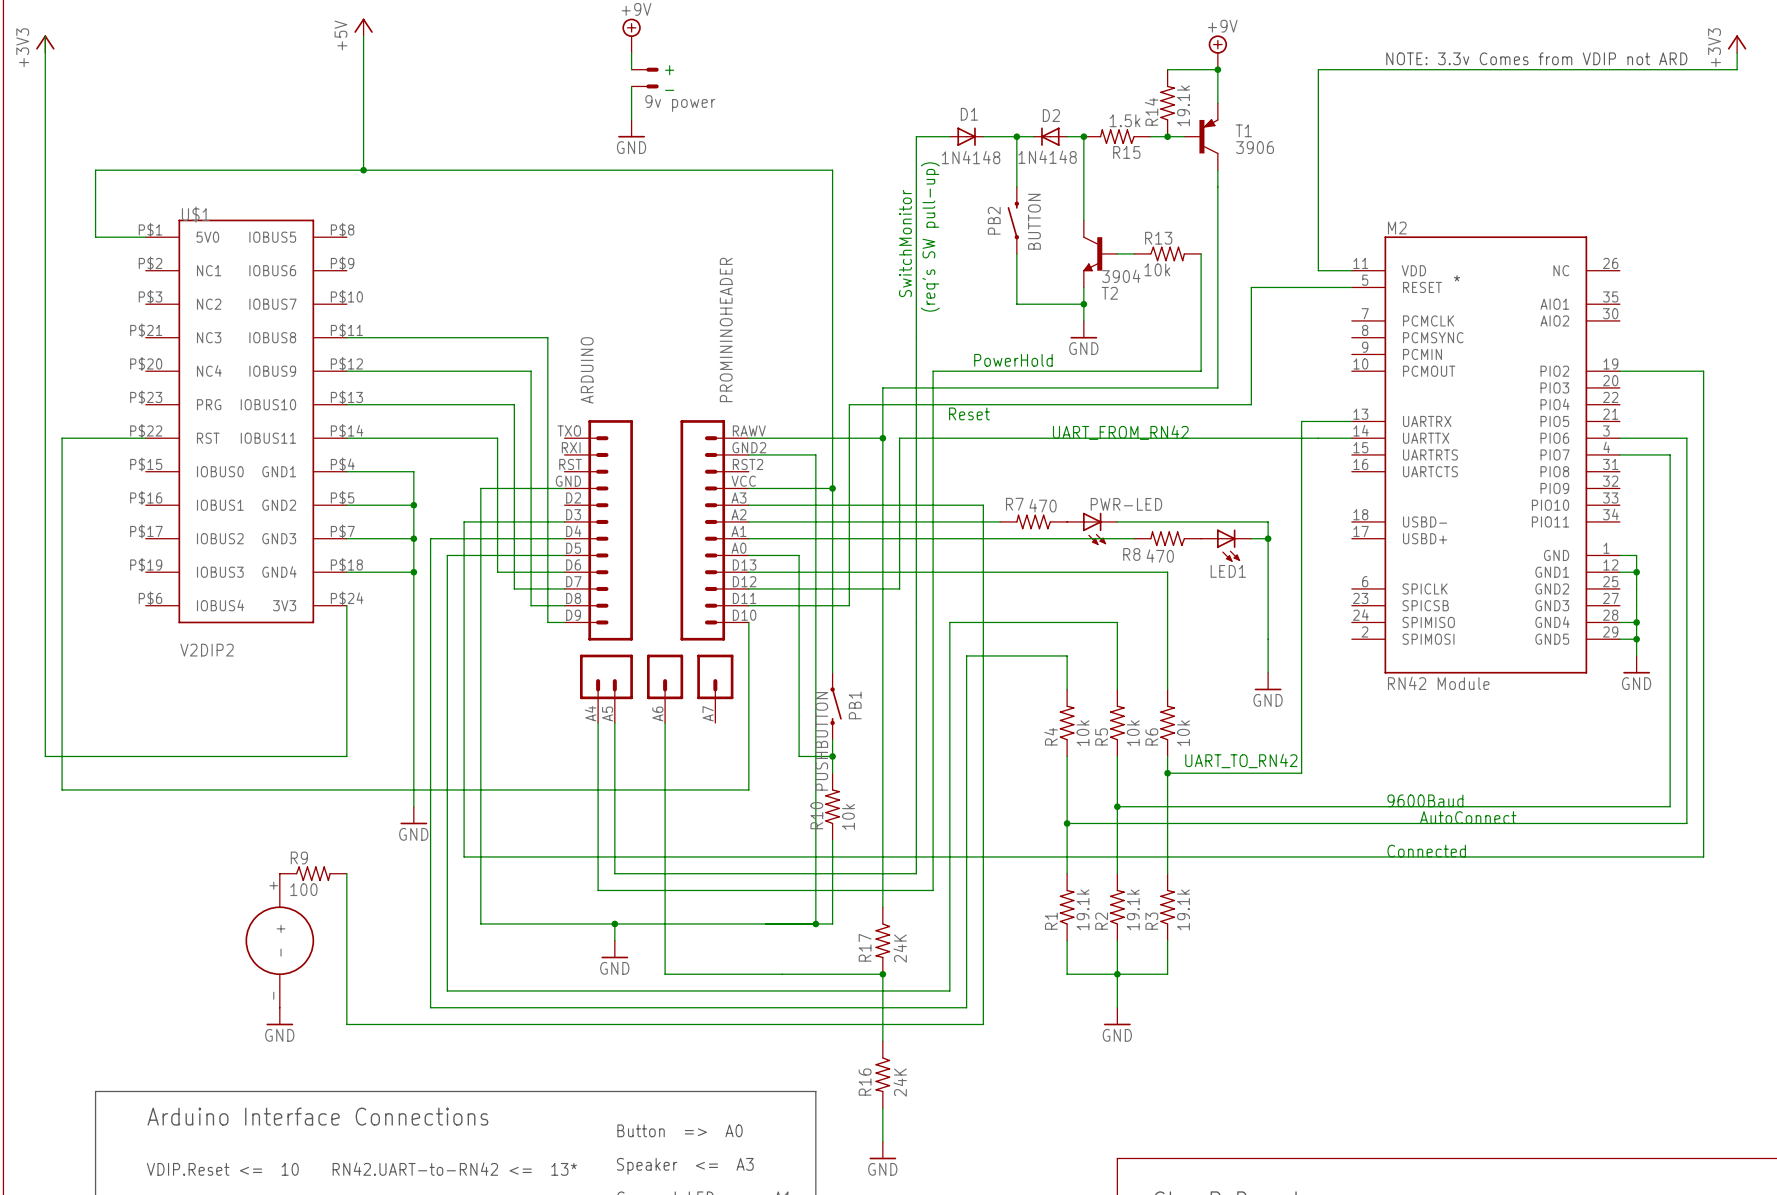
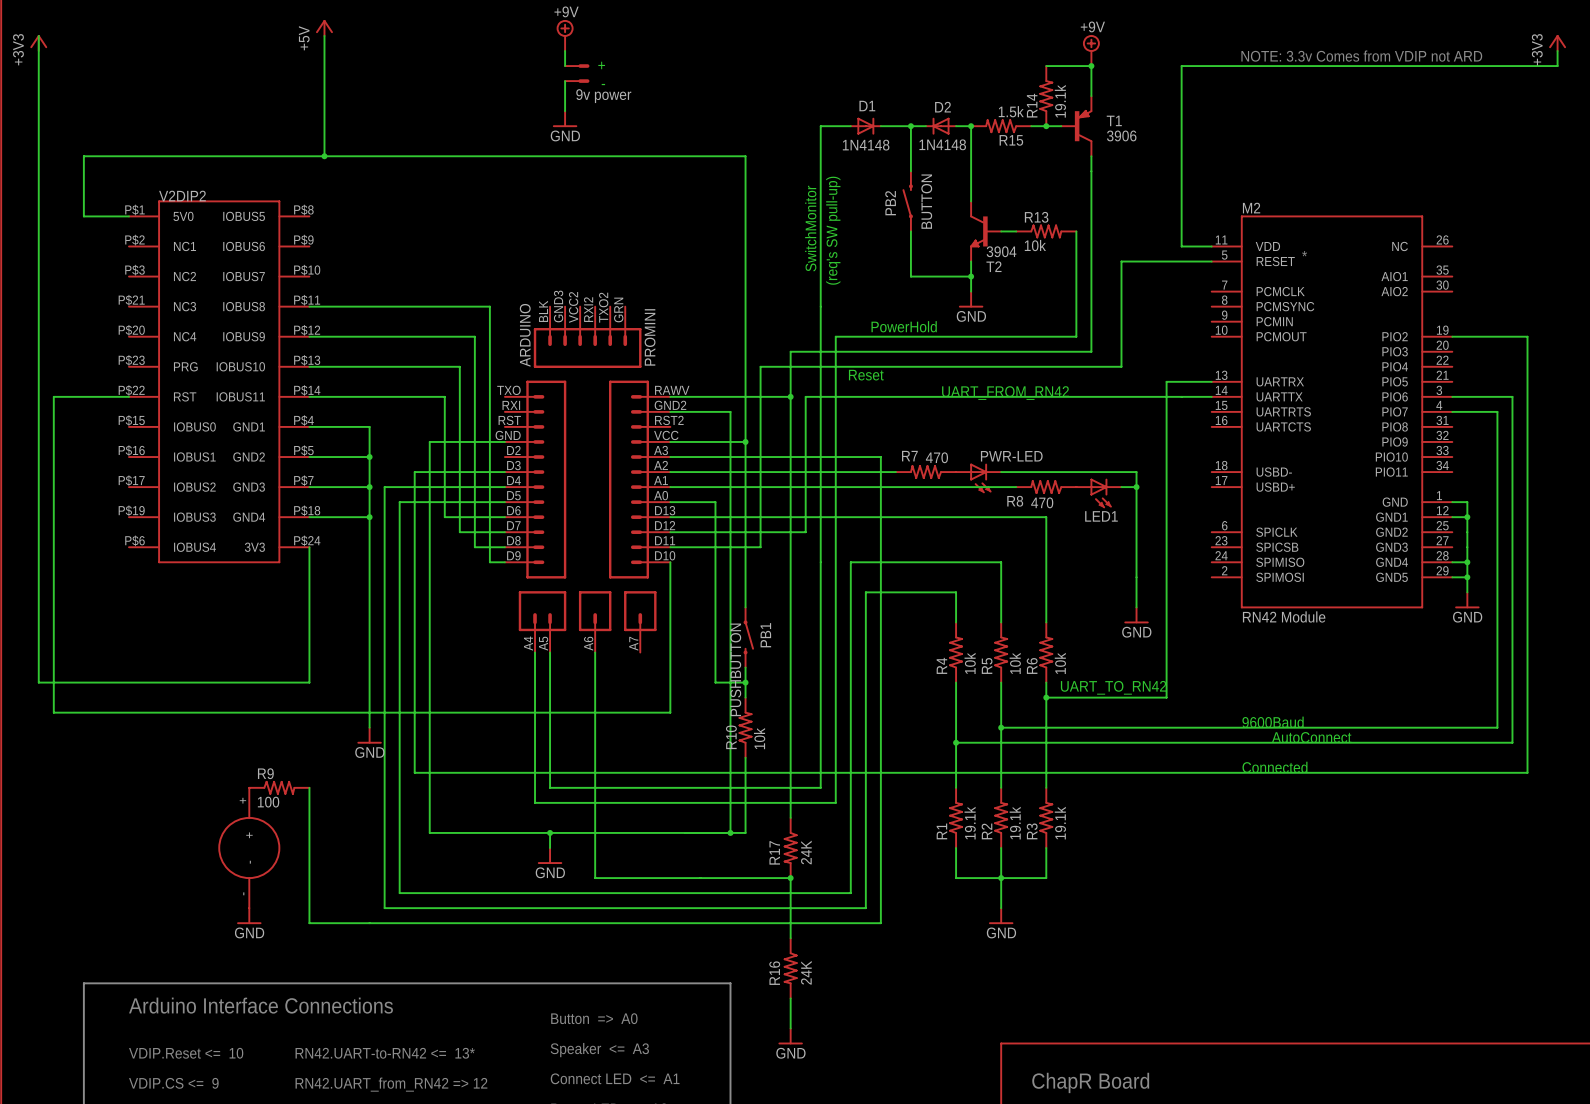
U$1 name: U$1 (195, 214) -> V2DIP2 (182, 196)
ARDUINO: none -> PROMINI (587, 479)
ARDUINO: PROMININOHEADER (656, 571) -> none
U$1 value: V2DIP2 (207, 650) -> none

